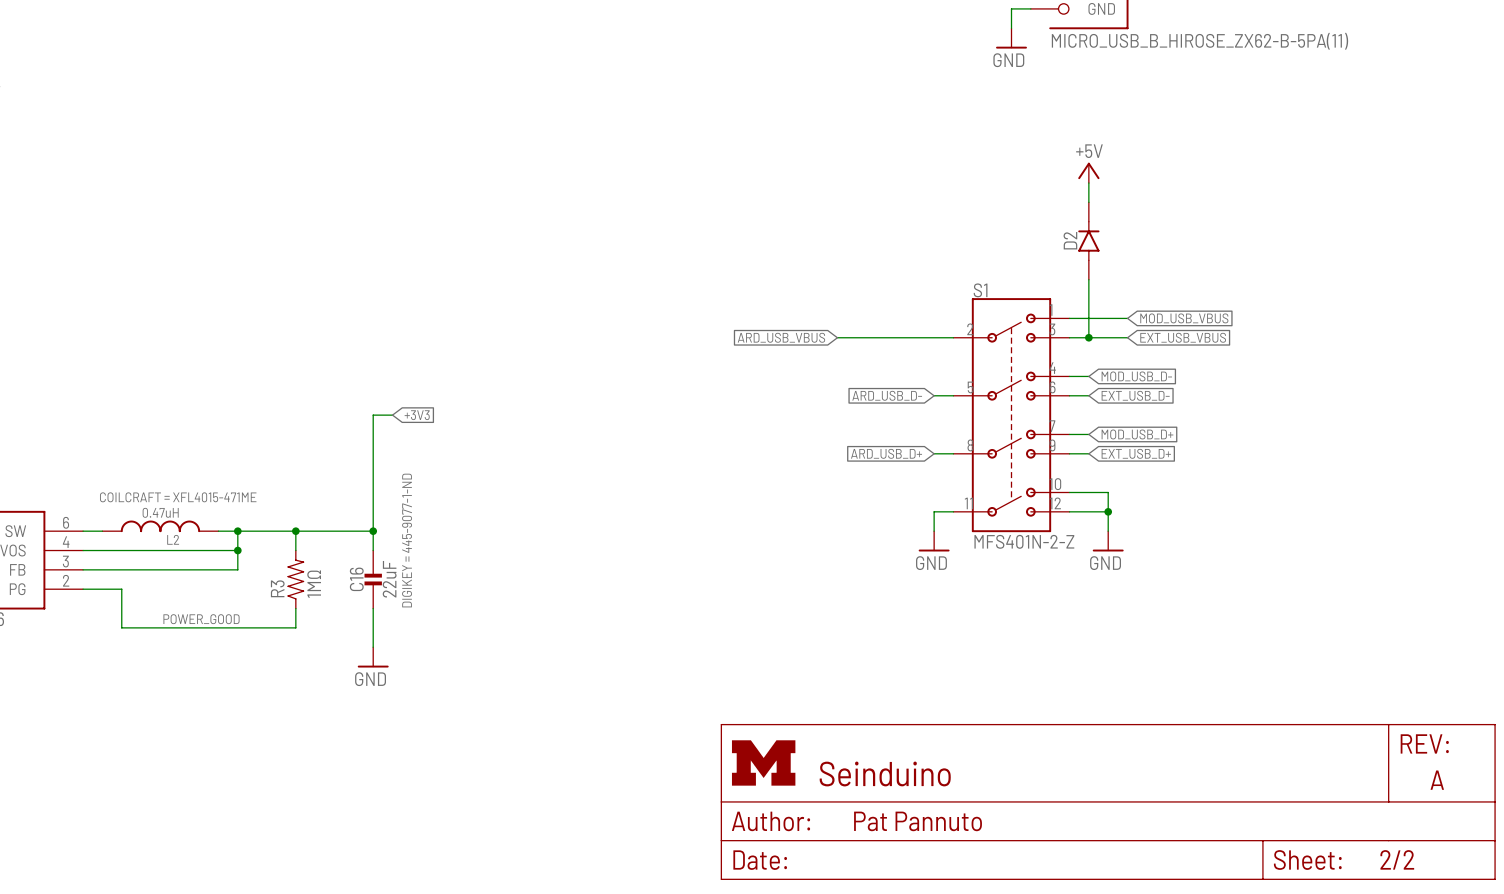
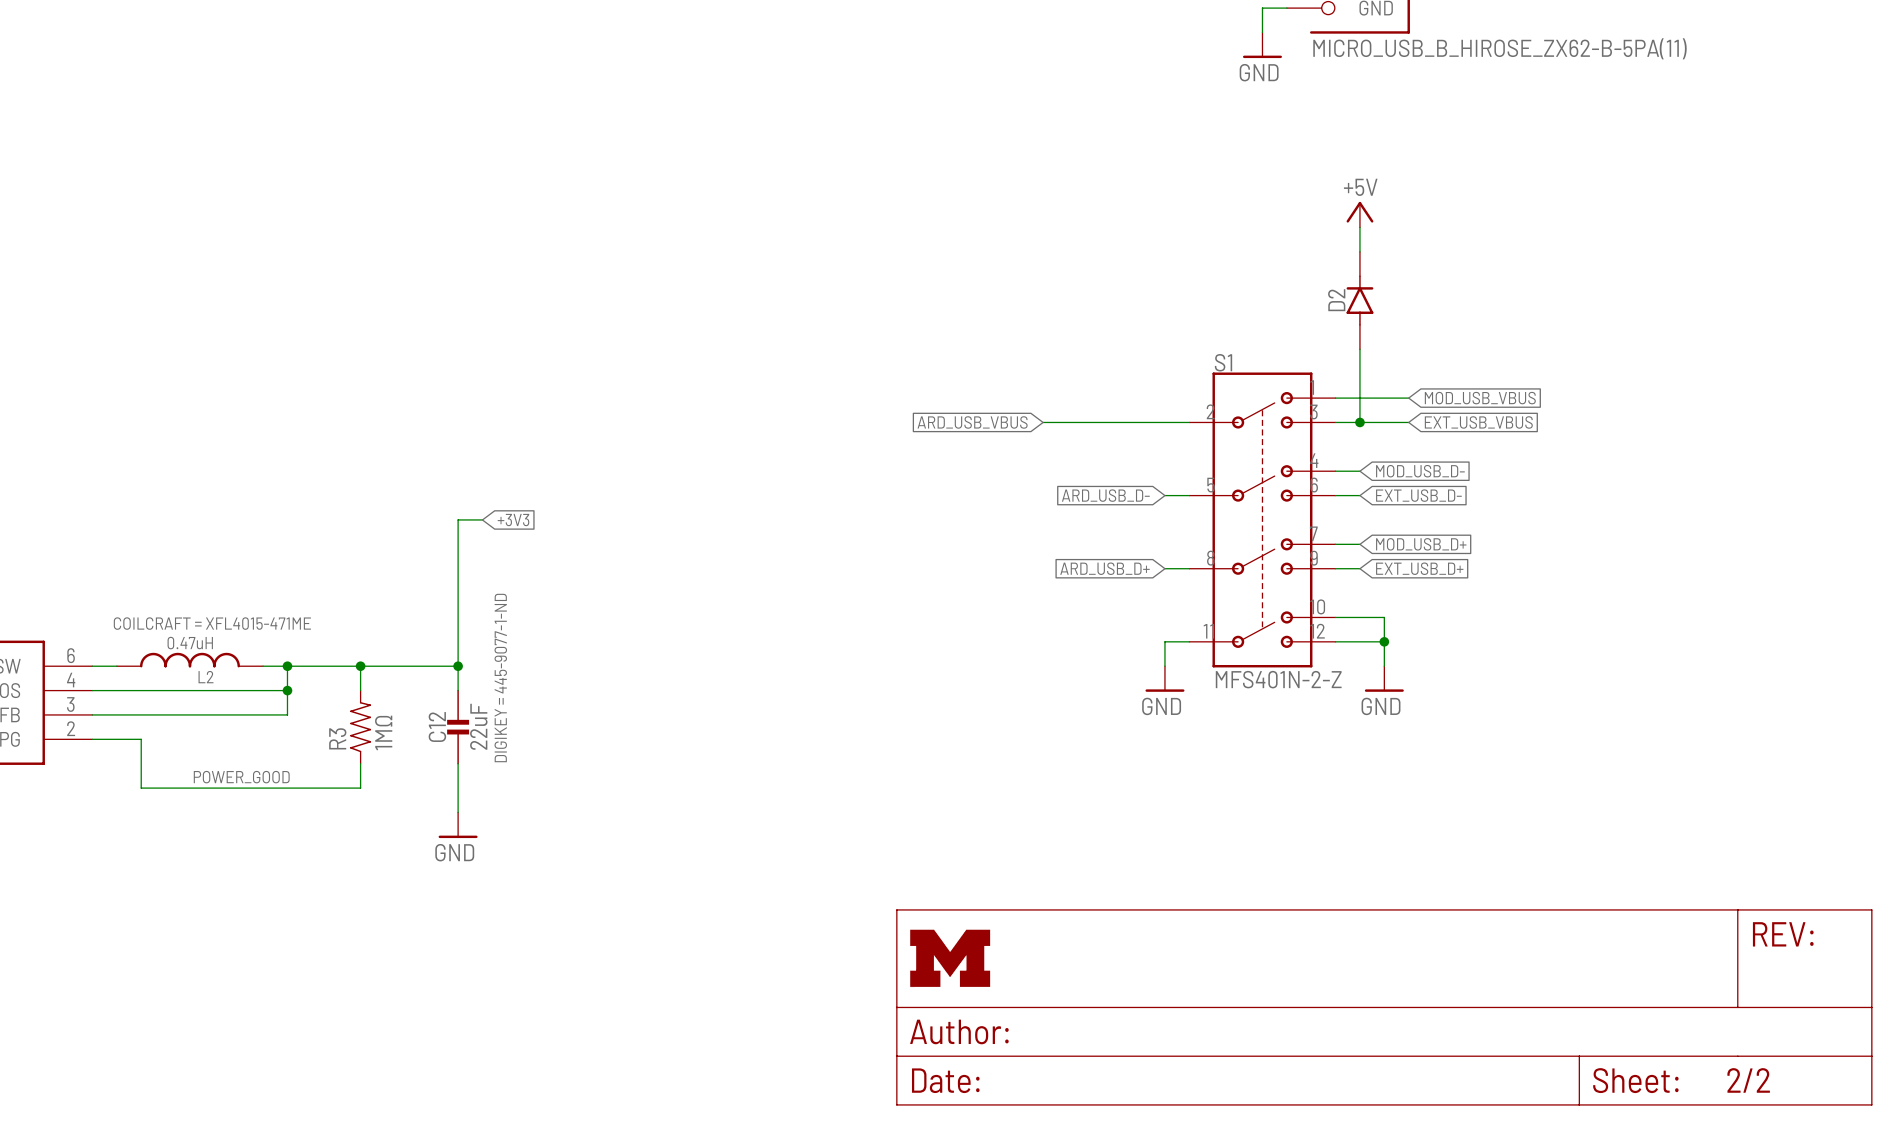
C16 name: C16 (356, 579) -> C12 (437, 726)
part text: Seinduino (885, 774) -> none
part text: A (1437, 780) -> none
part text: Pat Pannuto (918, 821) -> none

